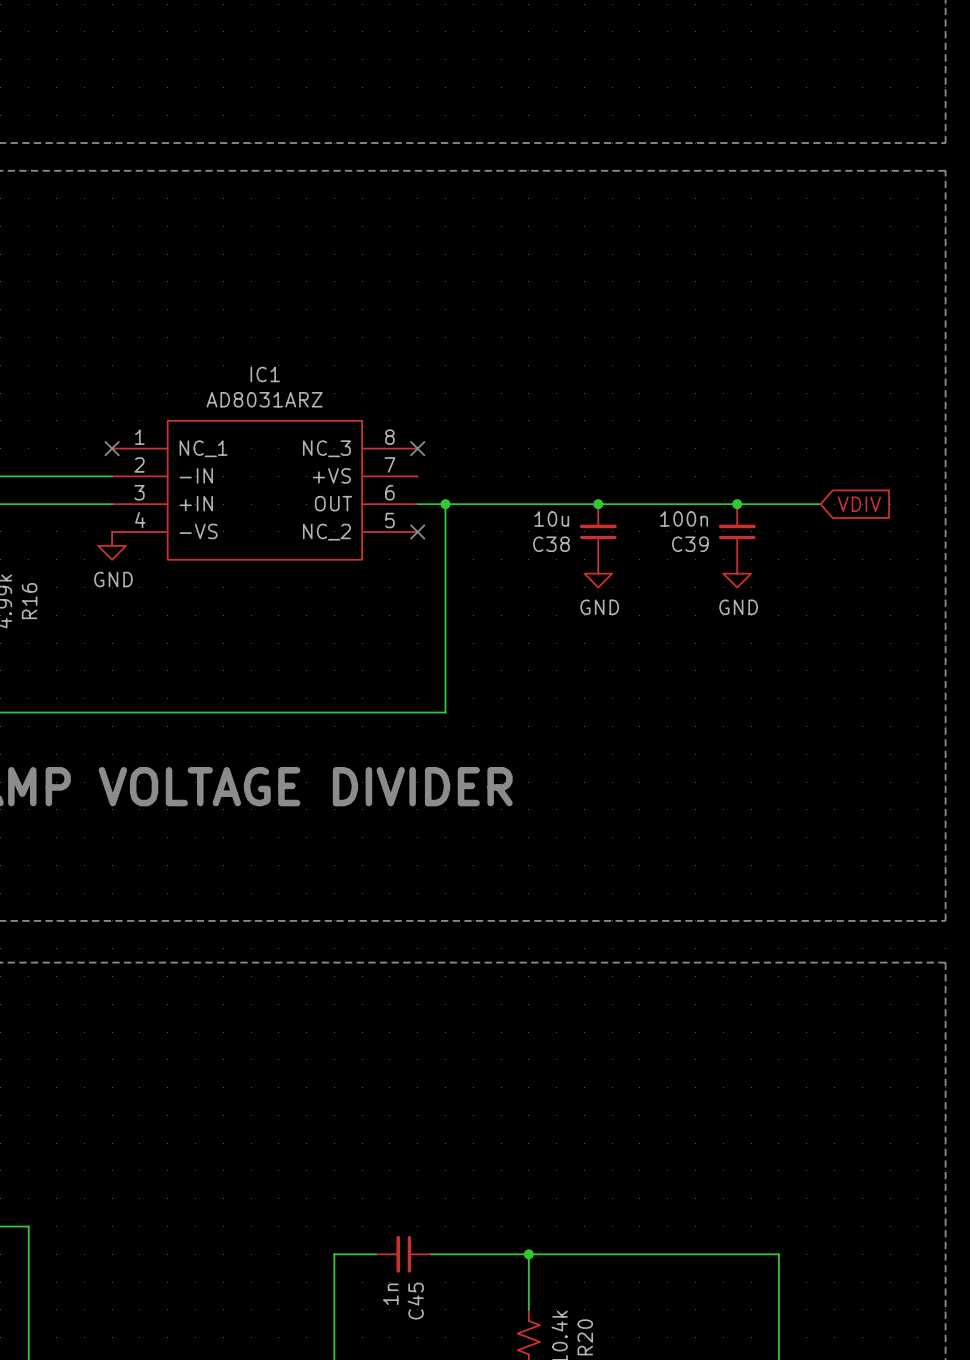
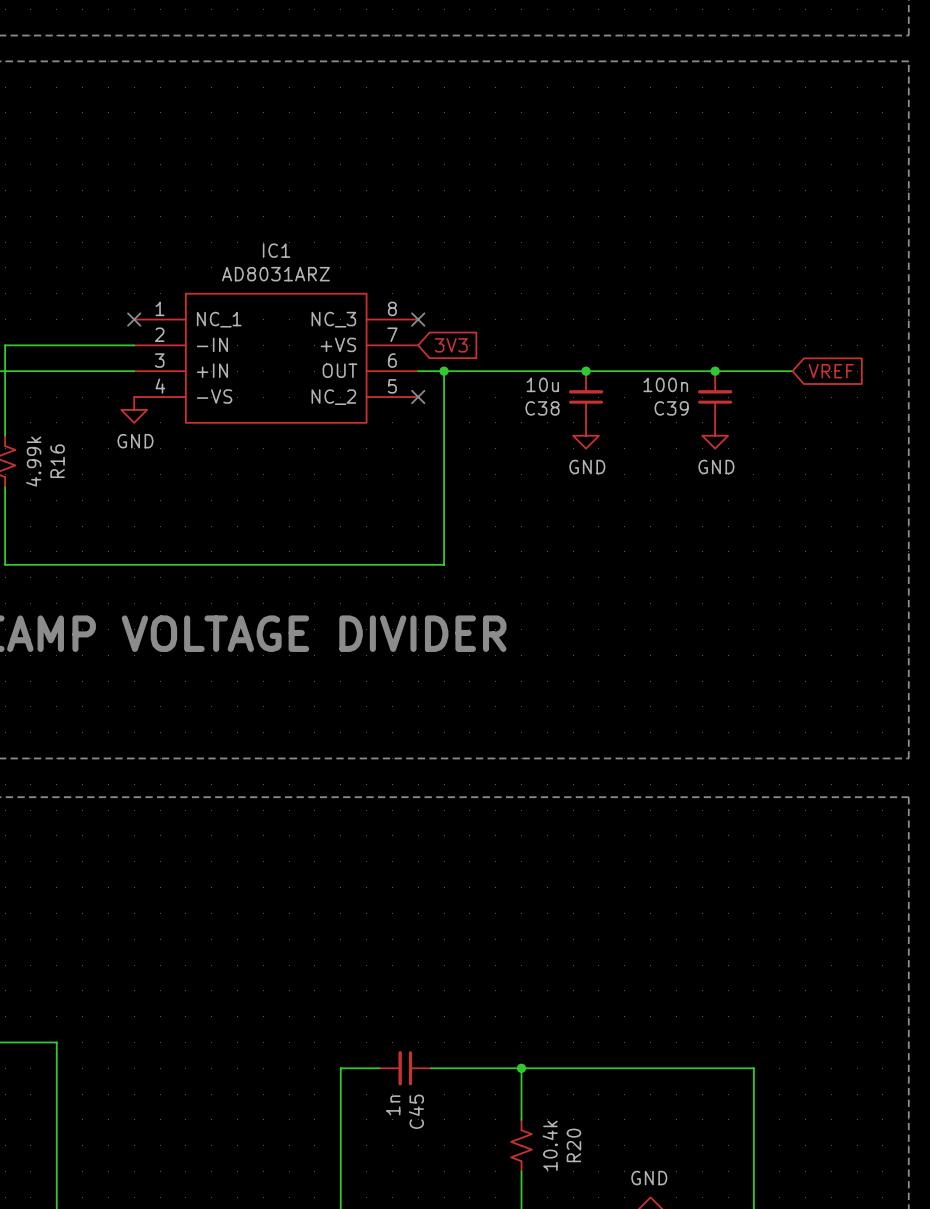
global label: none -> 3V3 (451, 345)
global label: VDIV (859, 504) -> VREF (831, 371)

